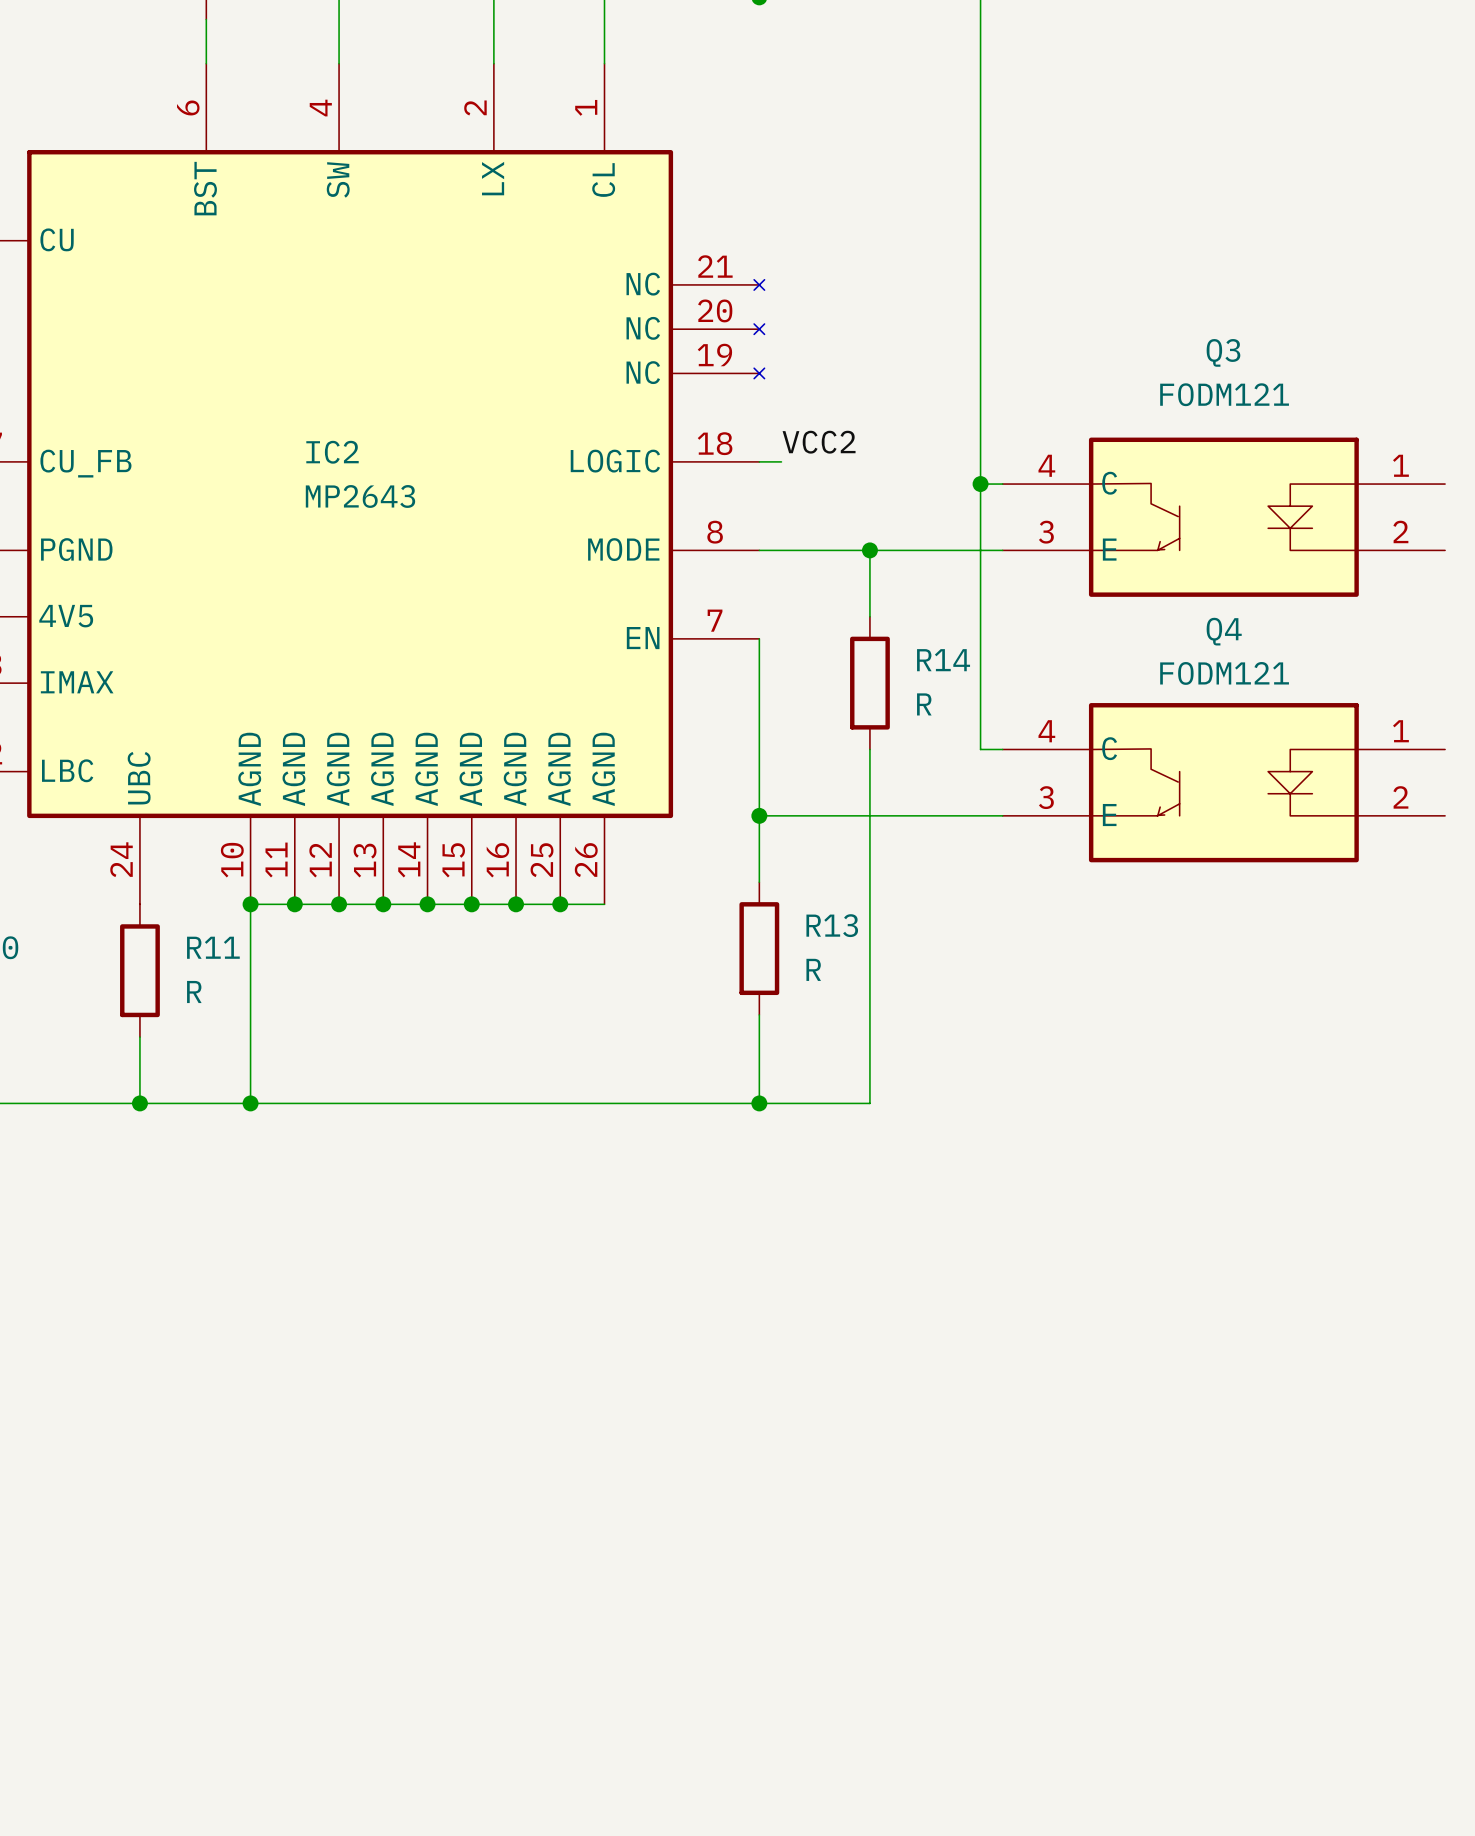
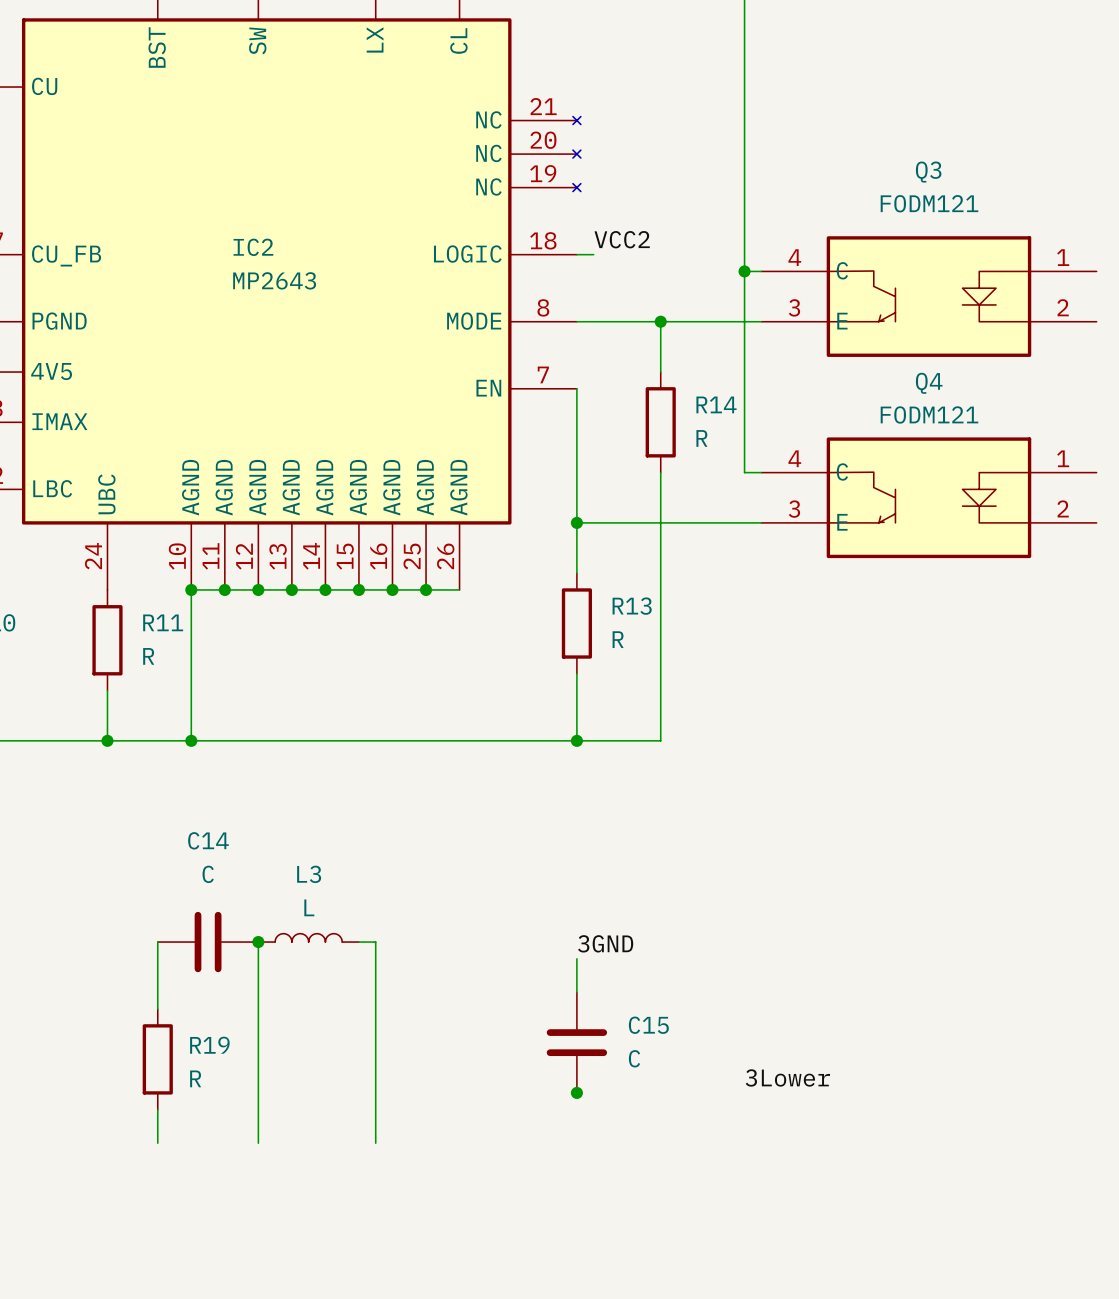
L3: none -> L (308, 937)
wire: none -> (157, 942) (157, 1009)
C14: none -> C (208, 942)
wire: none -> (258, 942) (258, 1143)
junction: none -> (258, 942)
wire: none -> (358, 942) (375, 942) (375, 1143)
label: none -> 3GND (605, 943)
wire: none -> (576, 958) (576, 992)
C15: none -> C (576, 1042)
R19: none -> R (157, 1059)
label: none -> 3Lower (787, 1077)
junction: none -> (576, 1092)
wire: none -> (157, 1109) (157, 1143)

